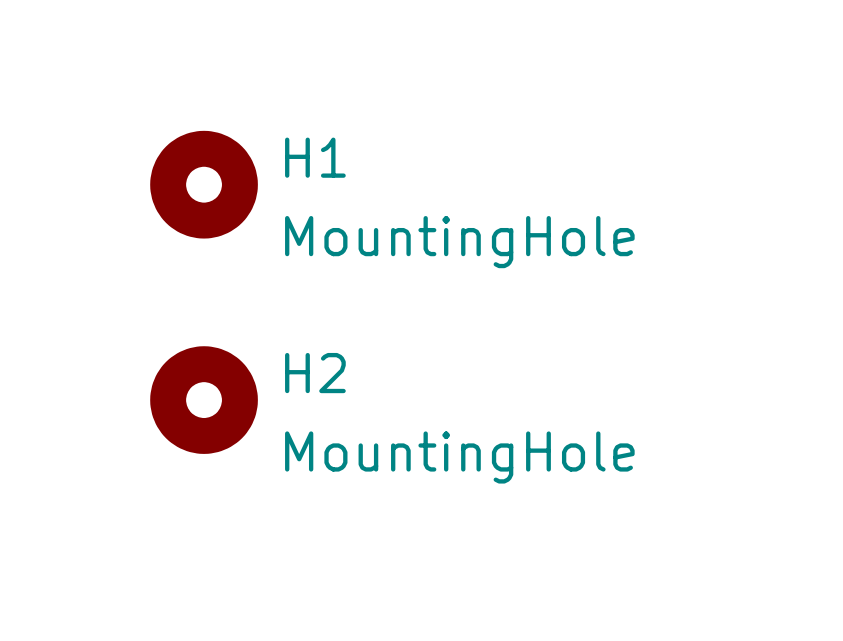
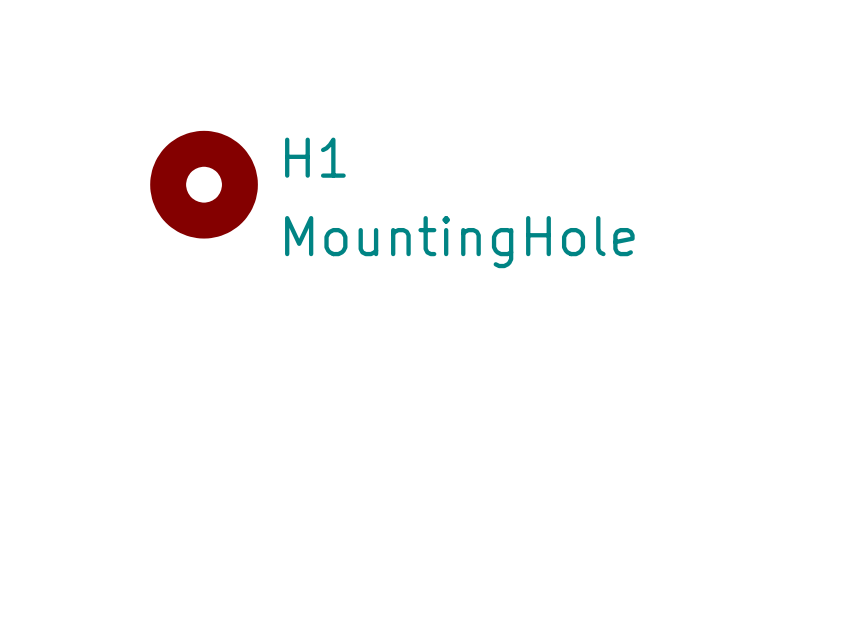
H2: MountingHole (204, 400) -> none

